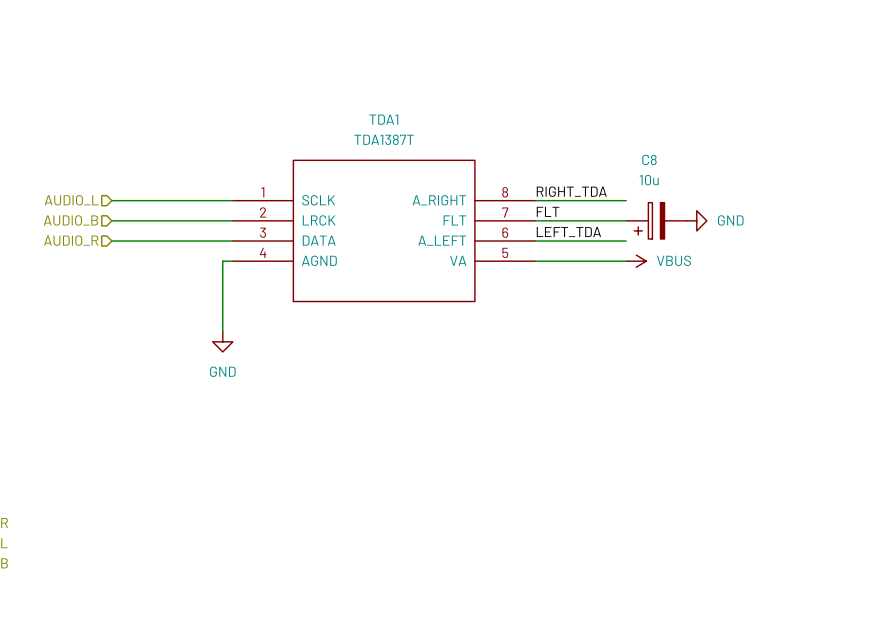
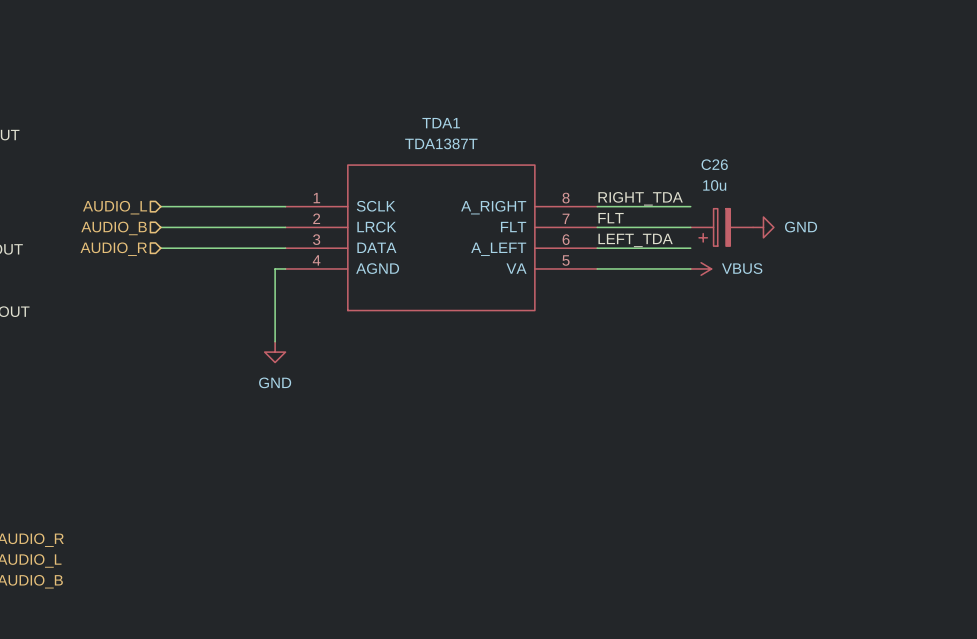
C8 name: C8 (649, 159) -> C26 (714, 164)

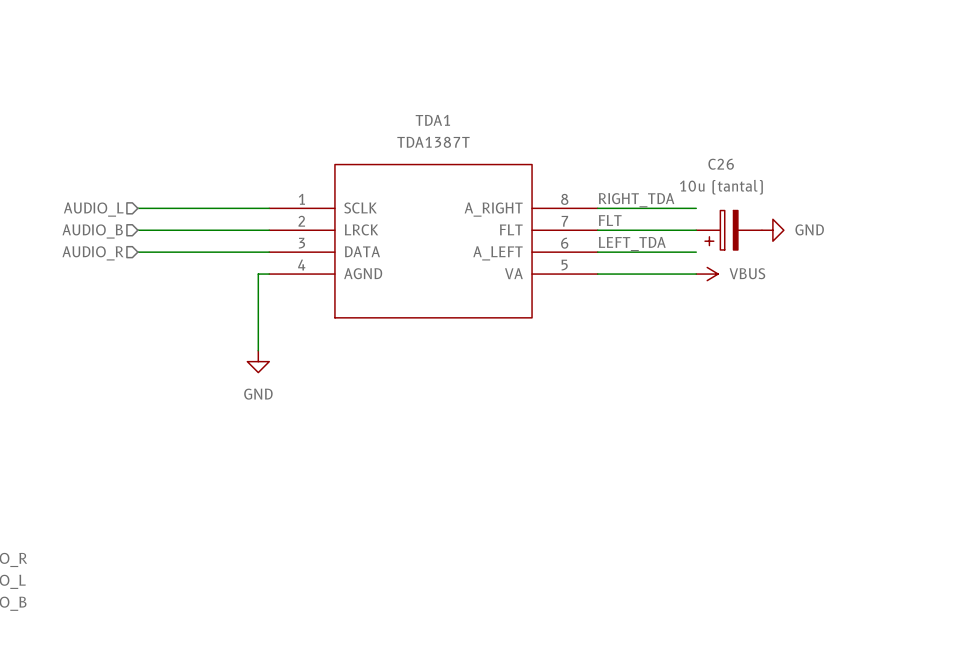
C26 value: 10u (714, 185) -> 10u (tantal) (721, 187)

